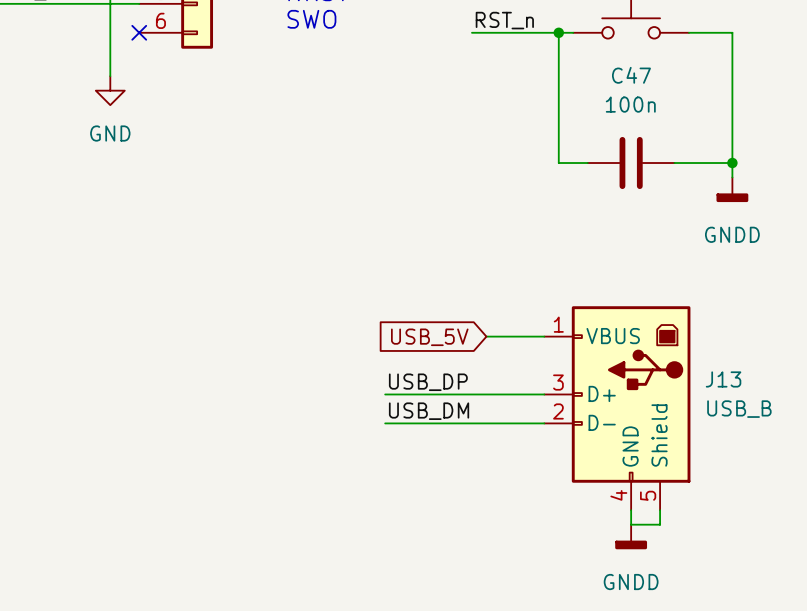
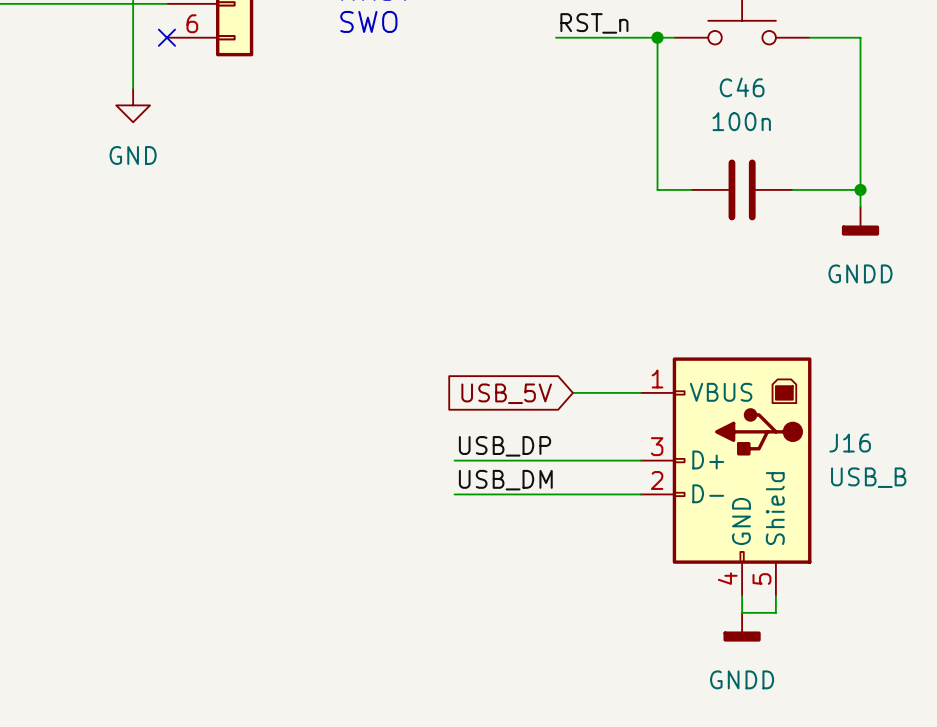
C47 name: C47 (631, 75) -> C46 (742, 87)
J13 name: J13 (723, 379) -> J16 (850, 443)

